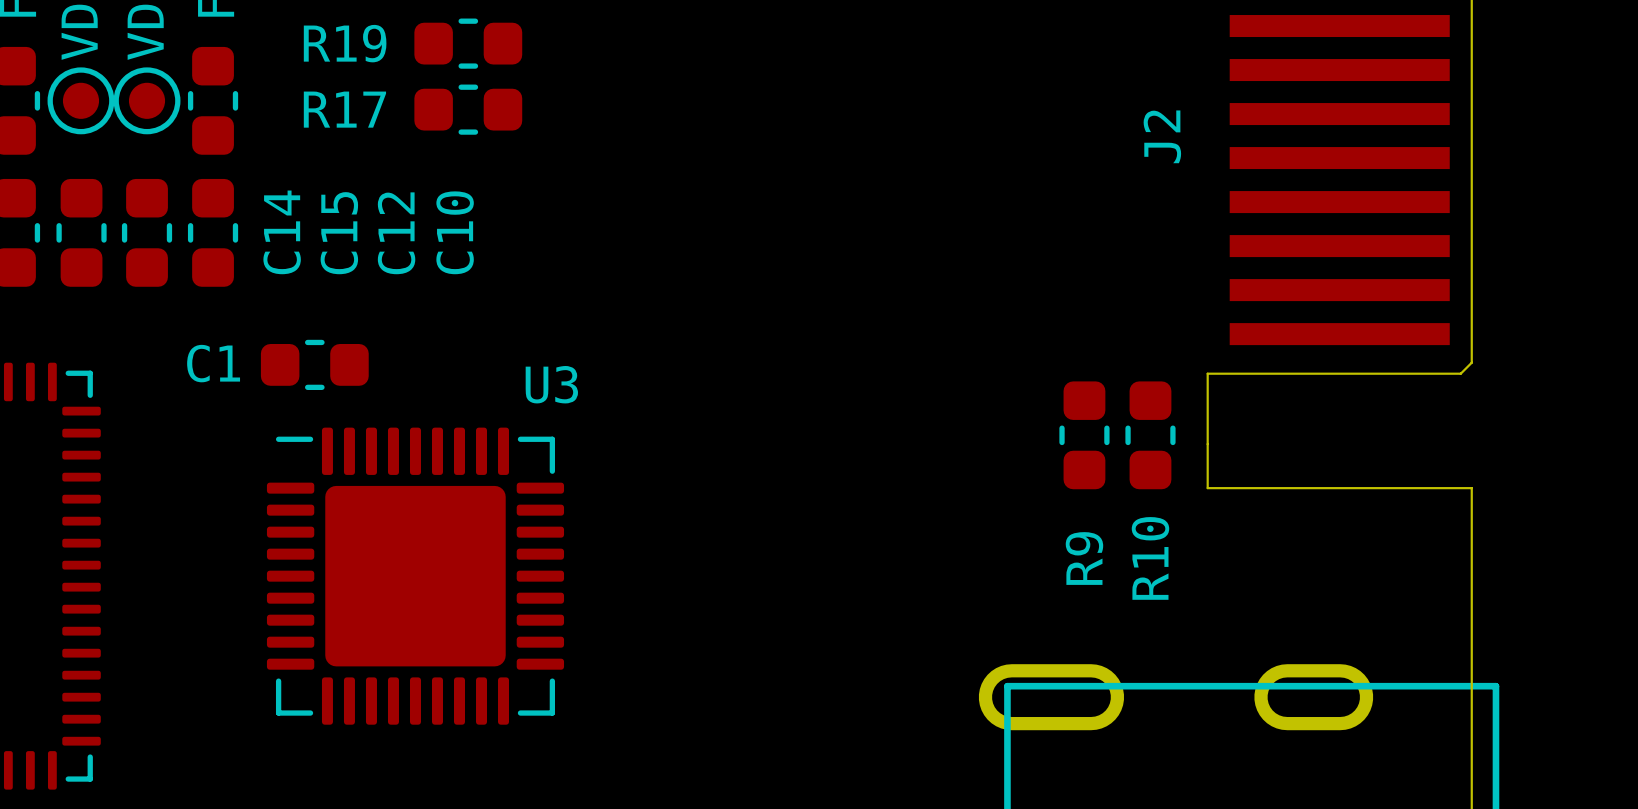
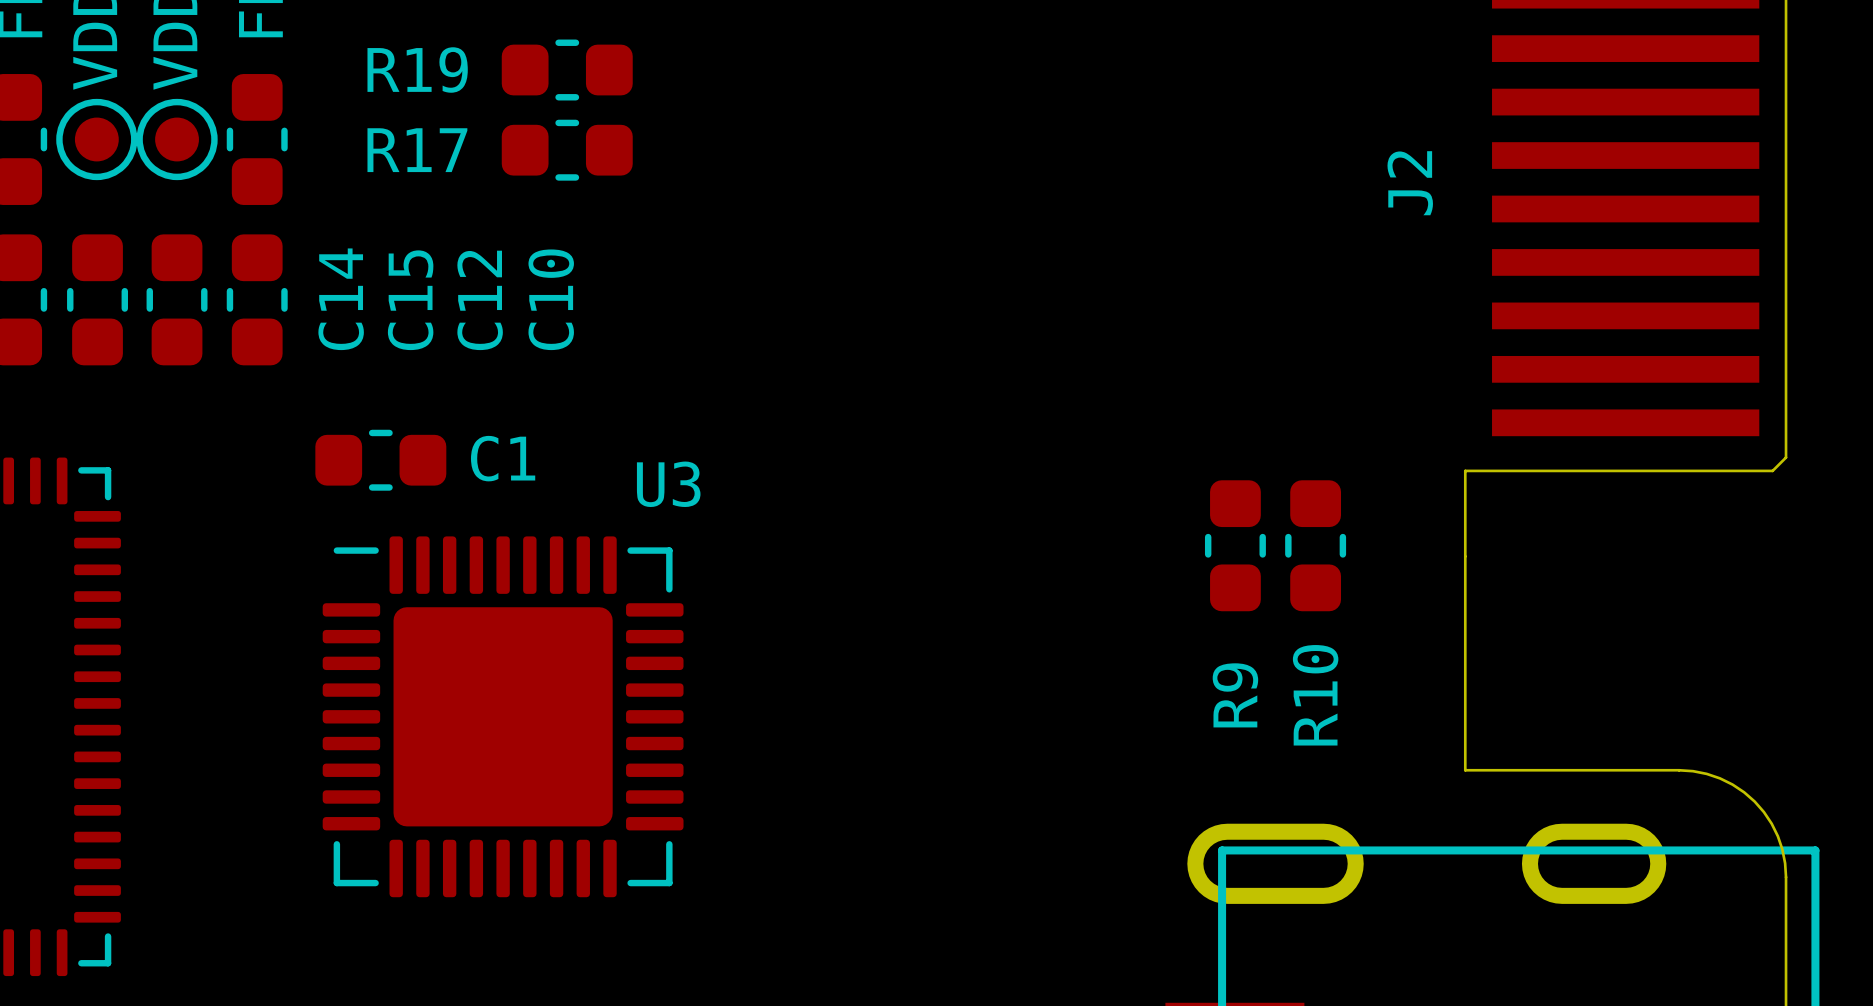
C1 name position: C1 (213, 363) -> C1 (503, 458)
R9: none -> (1235, 545)
R10: (1150, 435) -> none
board edge: (1207, 488) (1471, 488) (1471, 708) -> (1465, 609) (1465, 770) (1679, 770) (1706, 773) (1732, 784) (1754, 801) (1763, 812) (1777, 836) (1785, 863) (1786, 877)
R9 name: R9 (1084, 558) -> R10 (1315, 695)

